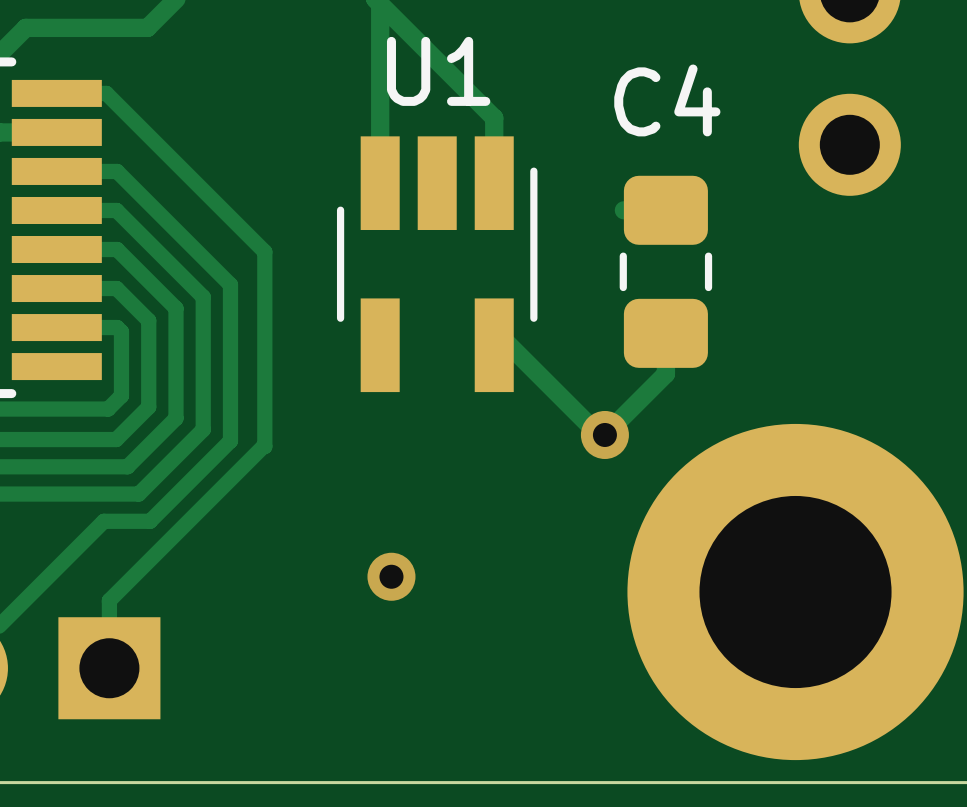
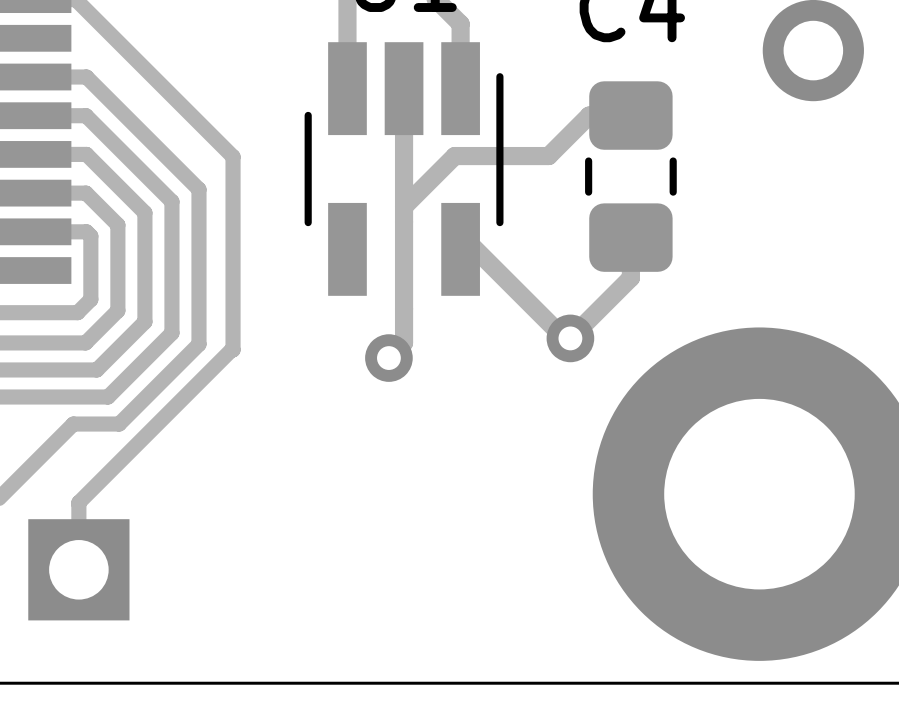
track: none -> (404, 103) (404, 342) (388, 358)
track: none -> (589, 115) (548, 156) (454, 156) (404, 206)
via position: (391, 576) -> (388, 358)

